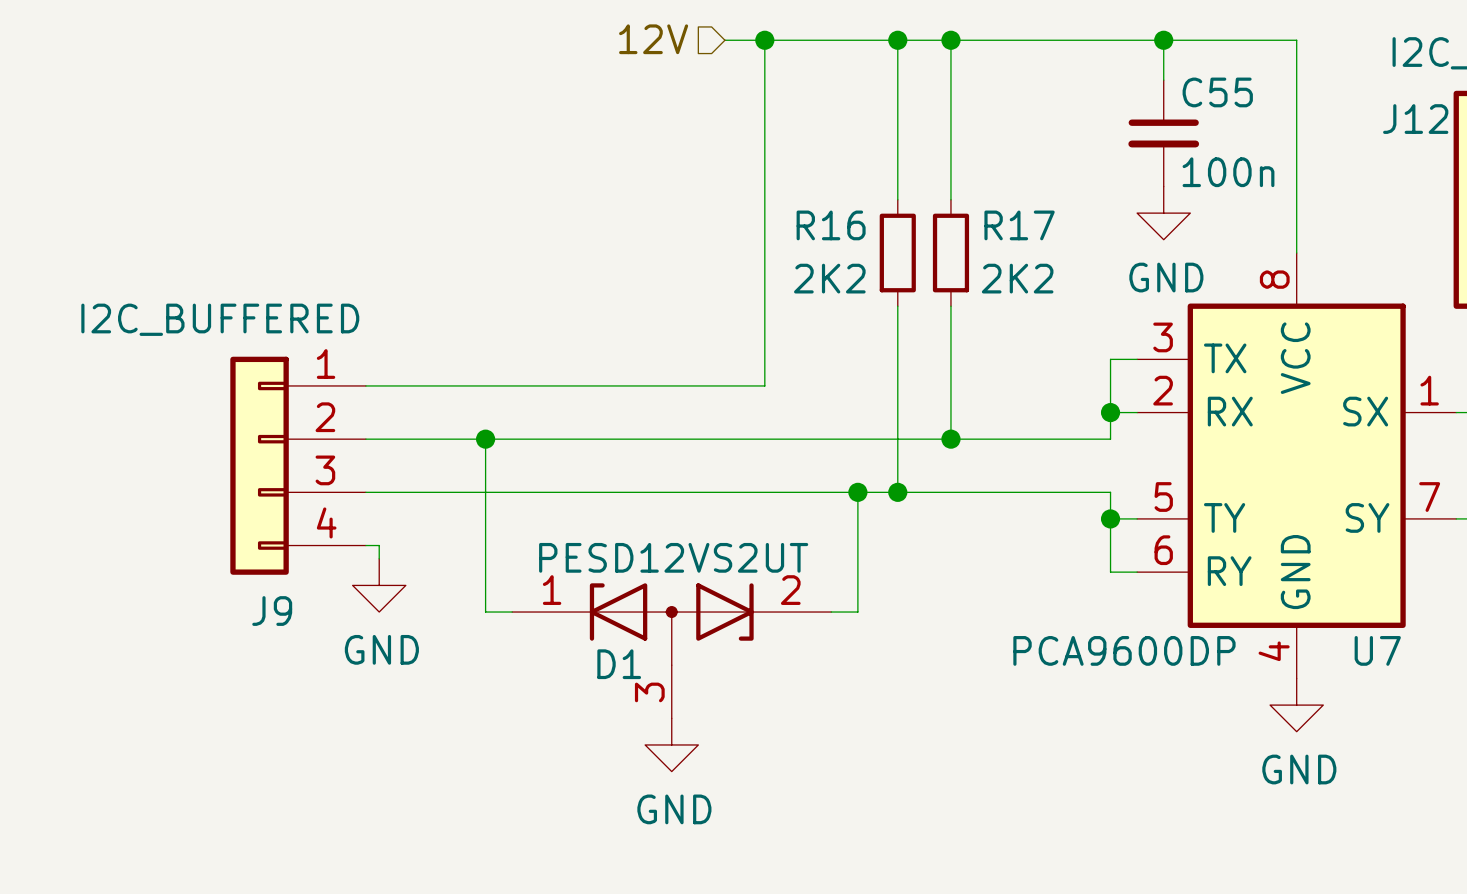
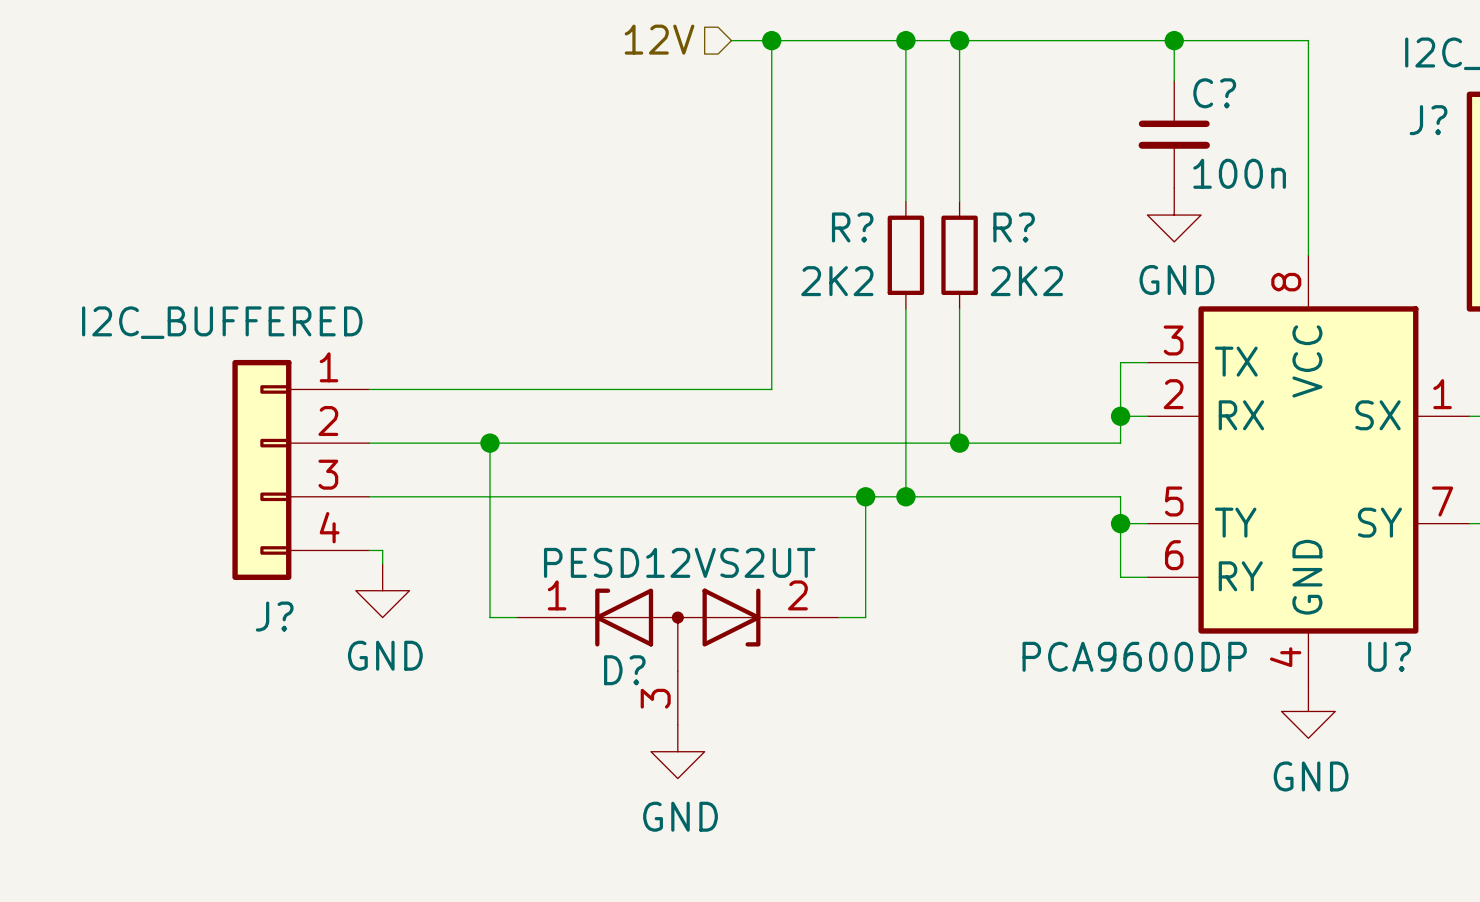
C55 name: C55 (1217, 92) -> C? (1214, 93)
J12 name: J12 (1415, 119) -> J? (1428, 120)
R16 name: R16 (831, 225) -> R? (852, 227)
R17 name: R17 (1019, 225) -> R? (1014, 227)
J9 name: J9 (272, 611) -> J? (274, 616)
U7 name: U7 (1377, 650) -> U? (1389, 656)
D1 name: D1 (619, 664) -> D? (624, 670)

